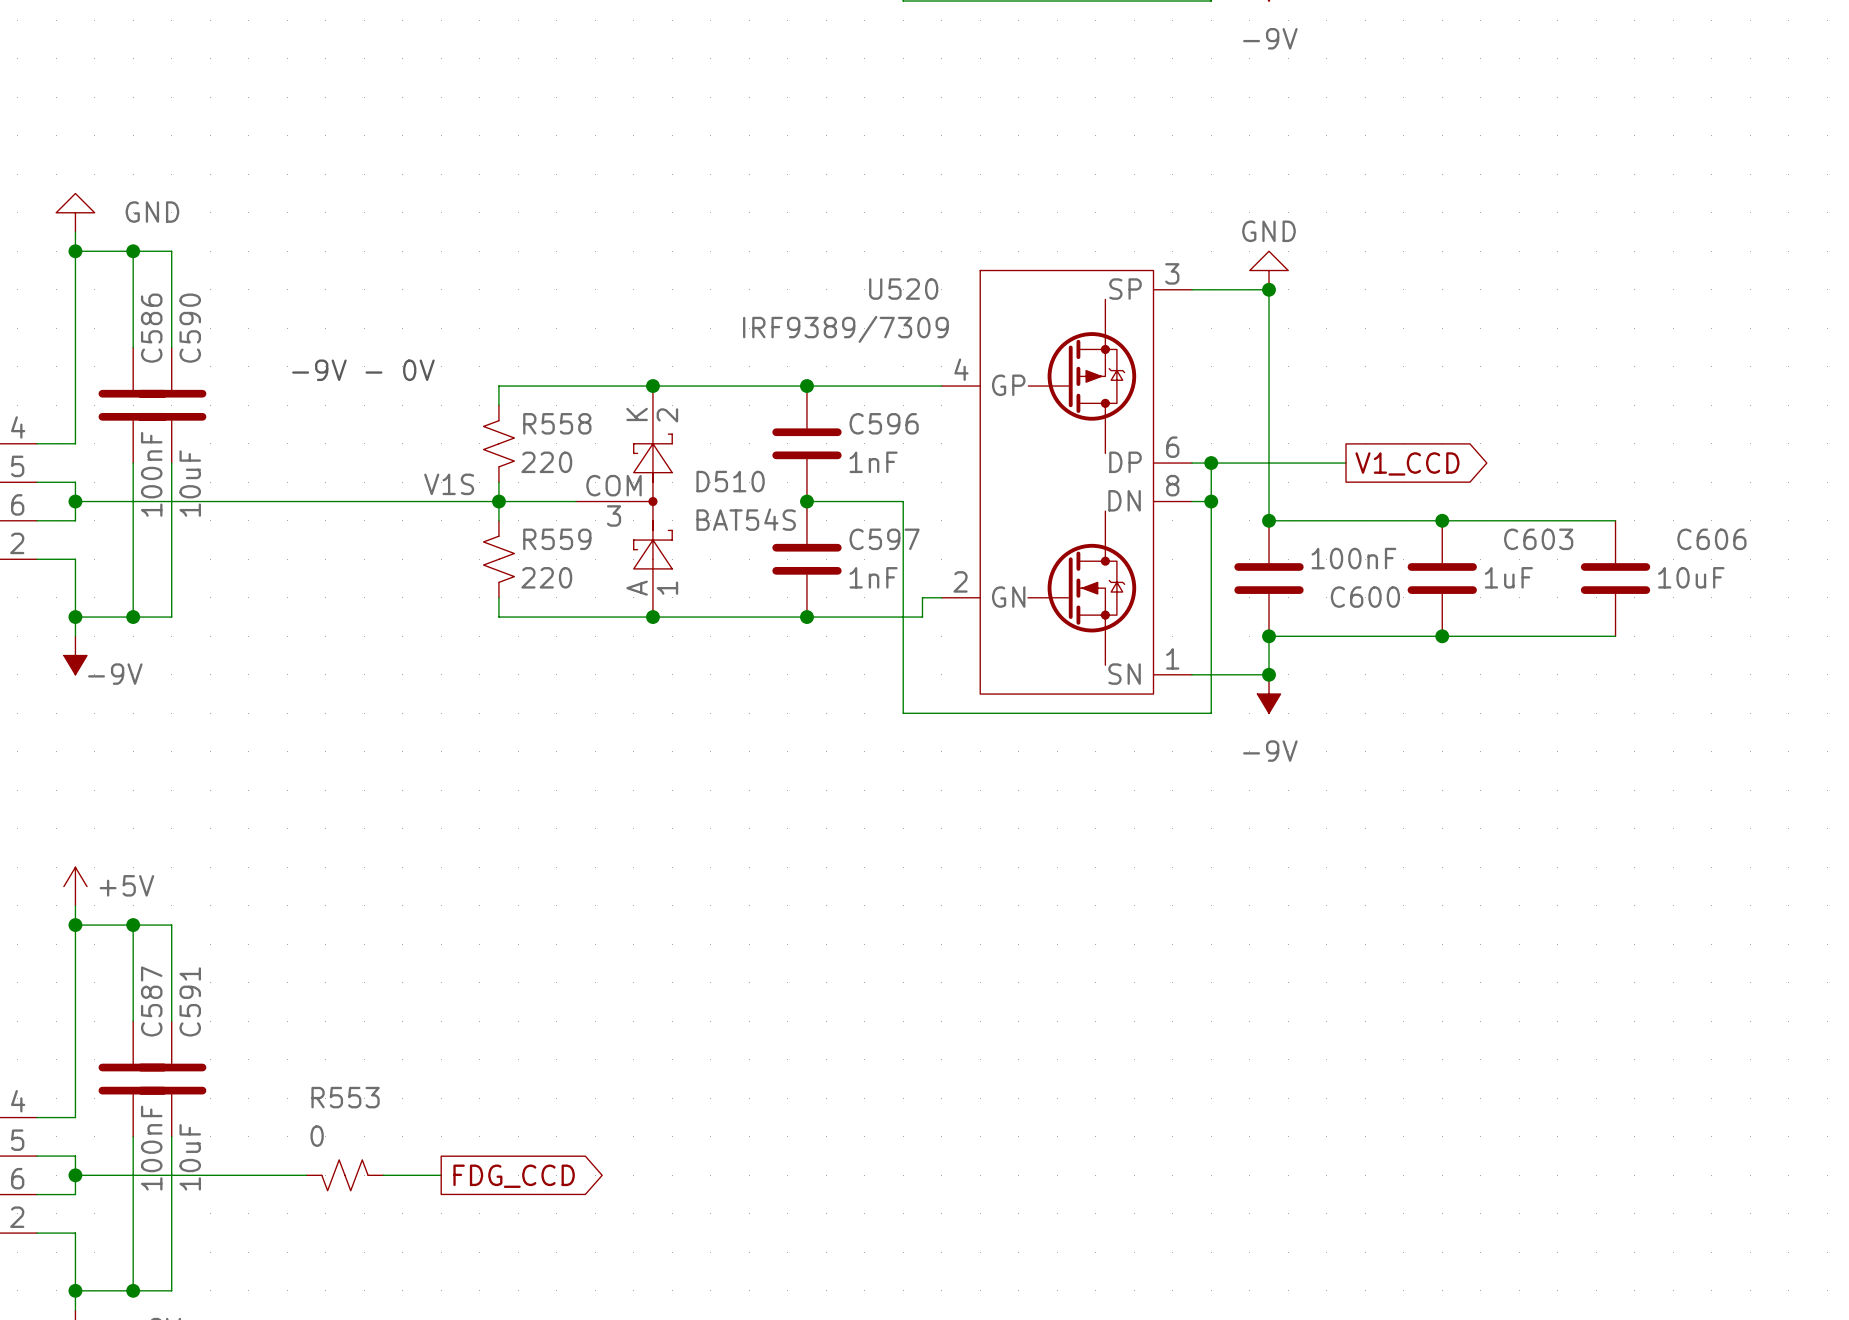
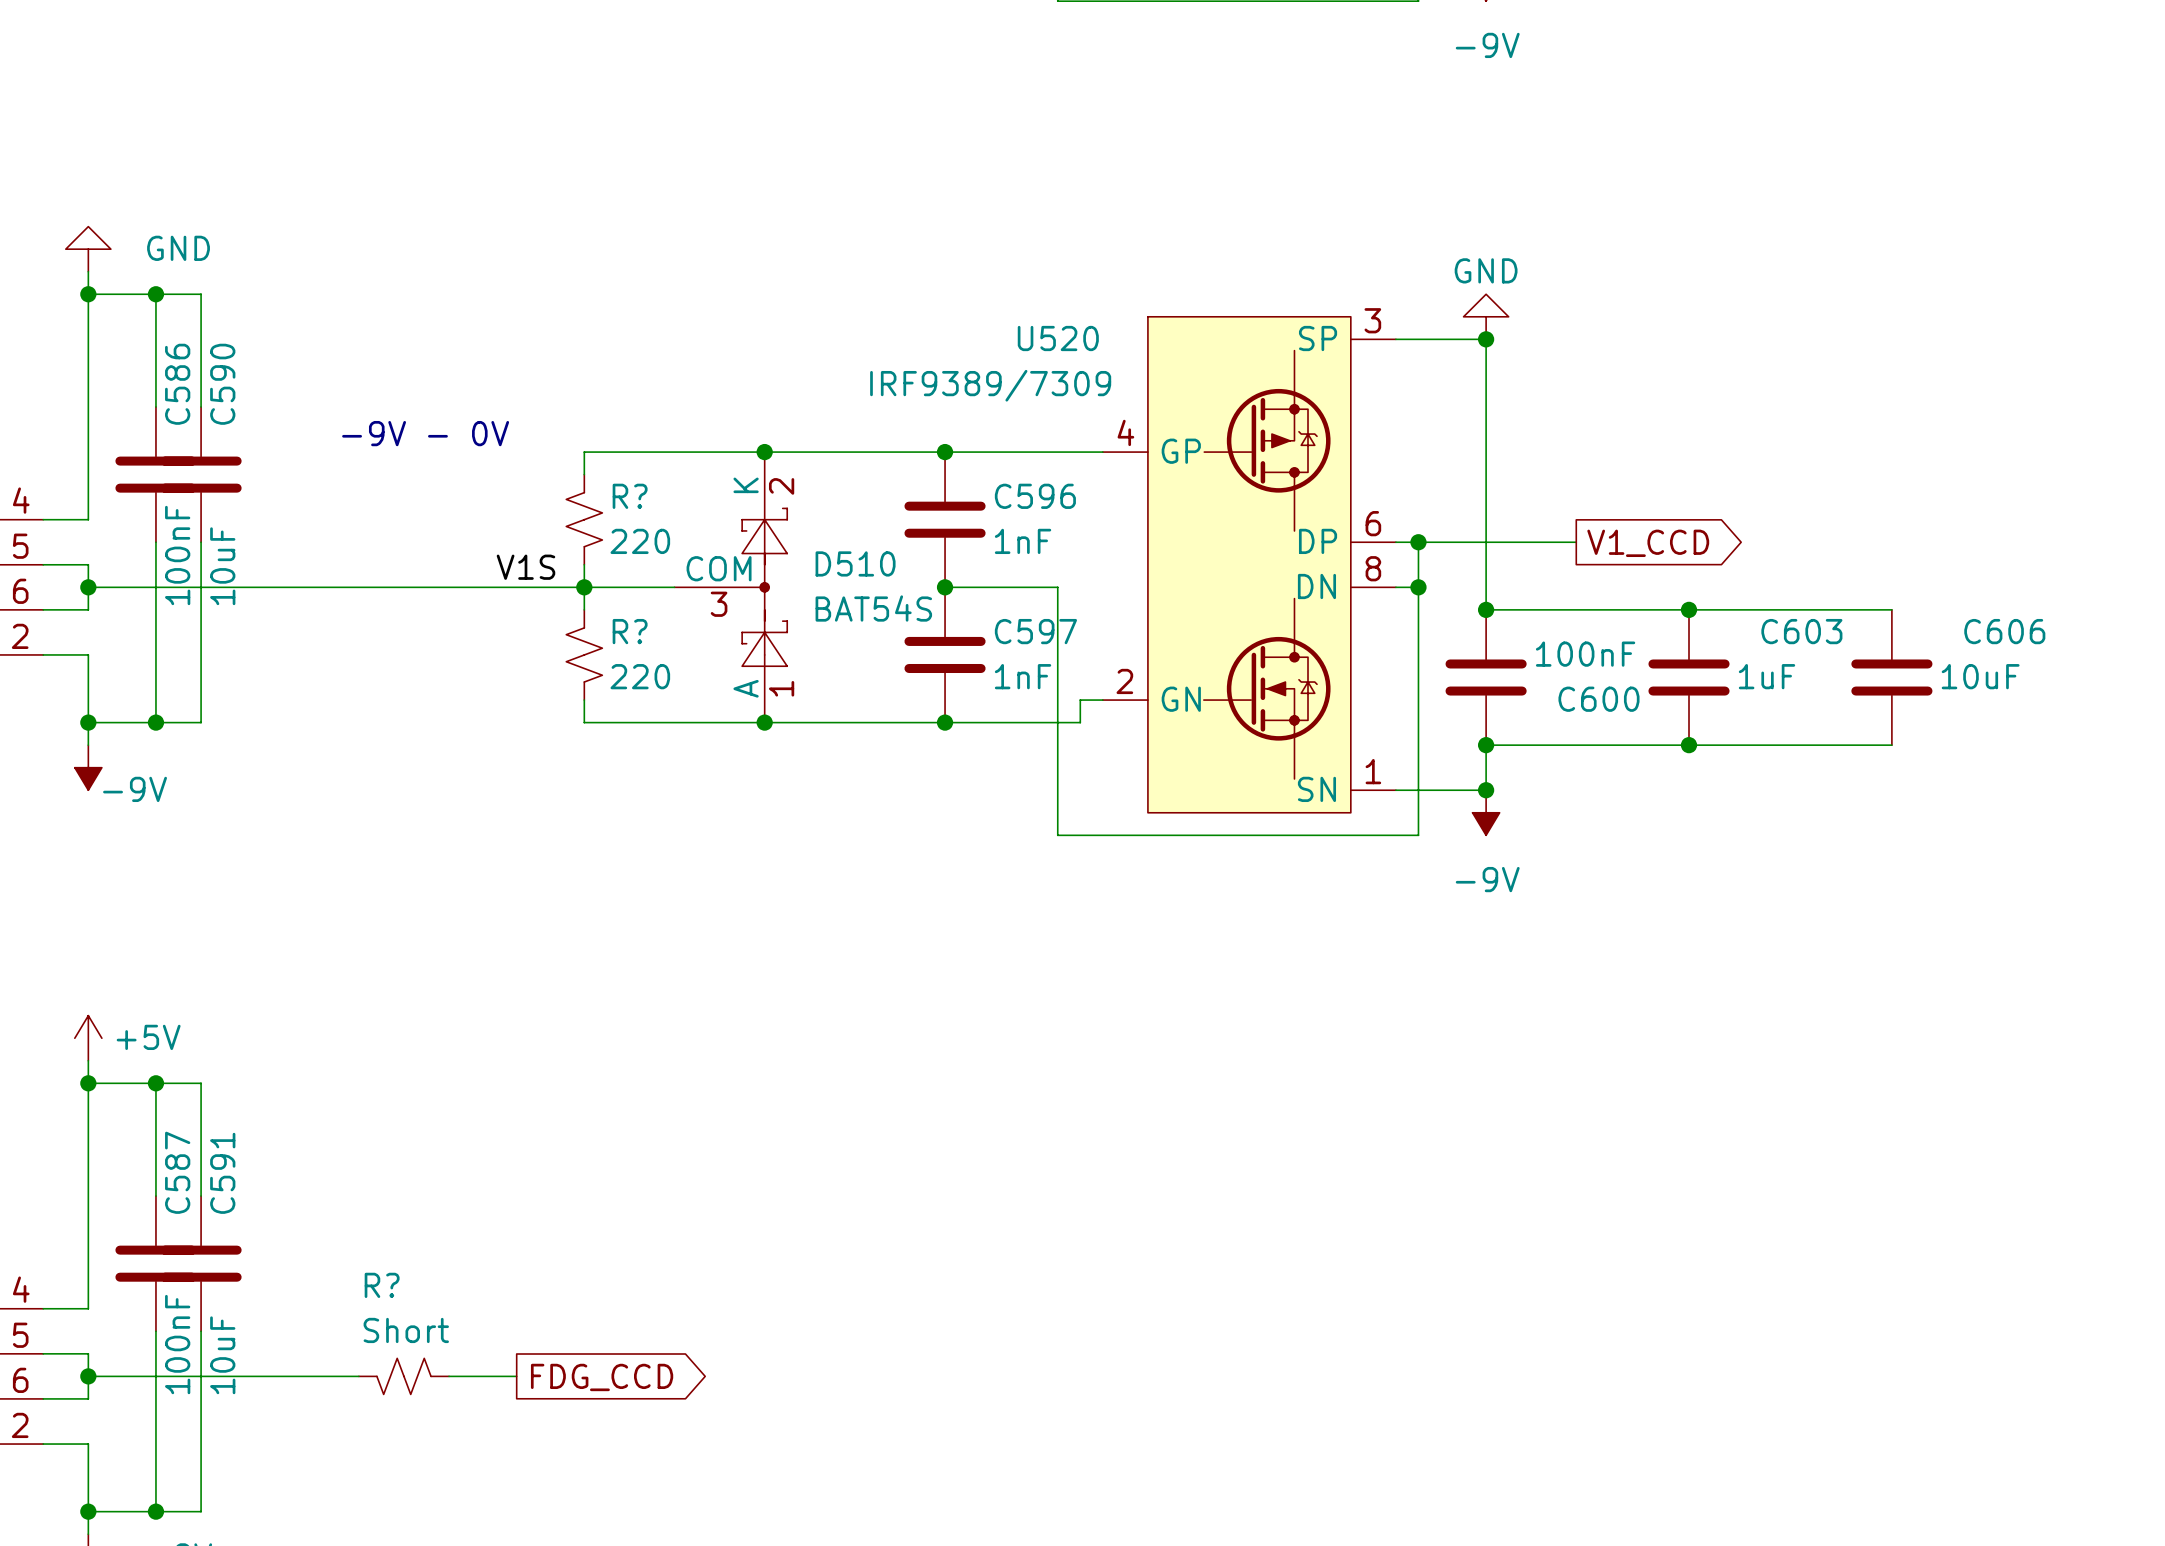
R558 name: R558 (557, 423) -> R? (630, 496)
R559 name: R559 (557, 539) -> R? (630, 631)
R553 name: R553 (345, 1097) -> R? (382, 1285)
R553 value: 0 (317, 1136) -> Short (406, 1330)

